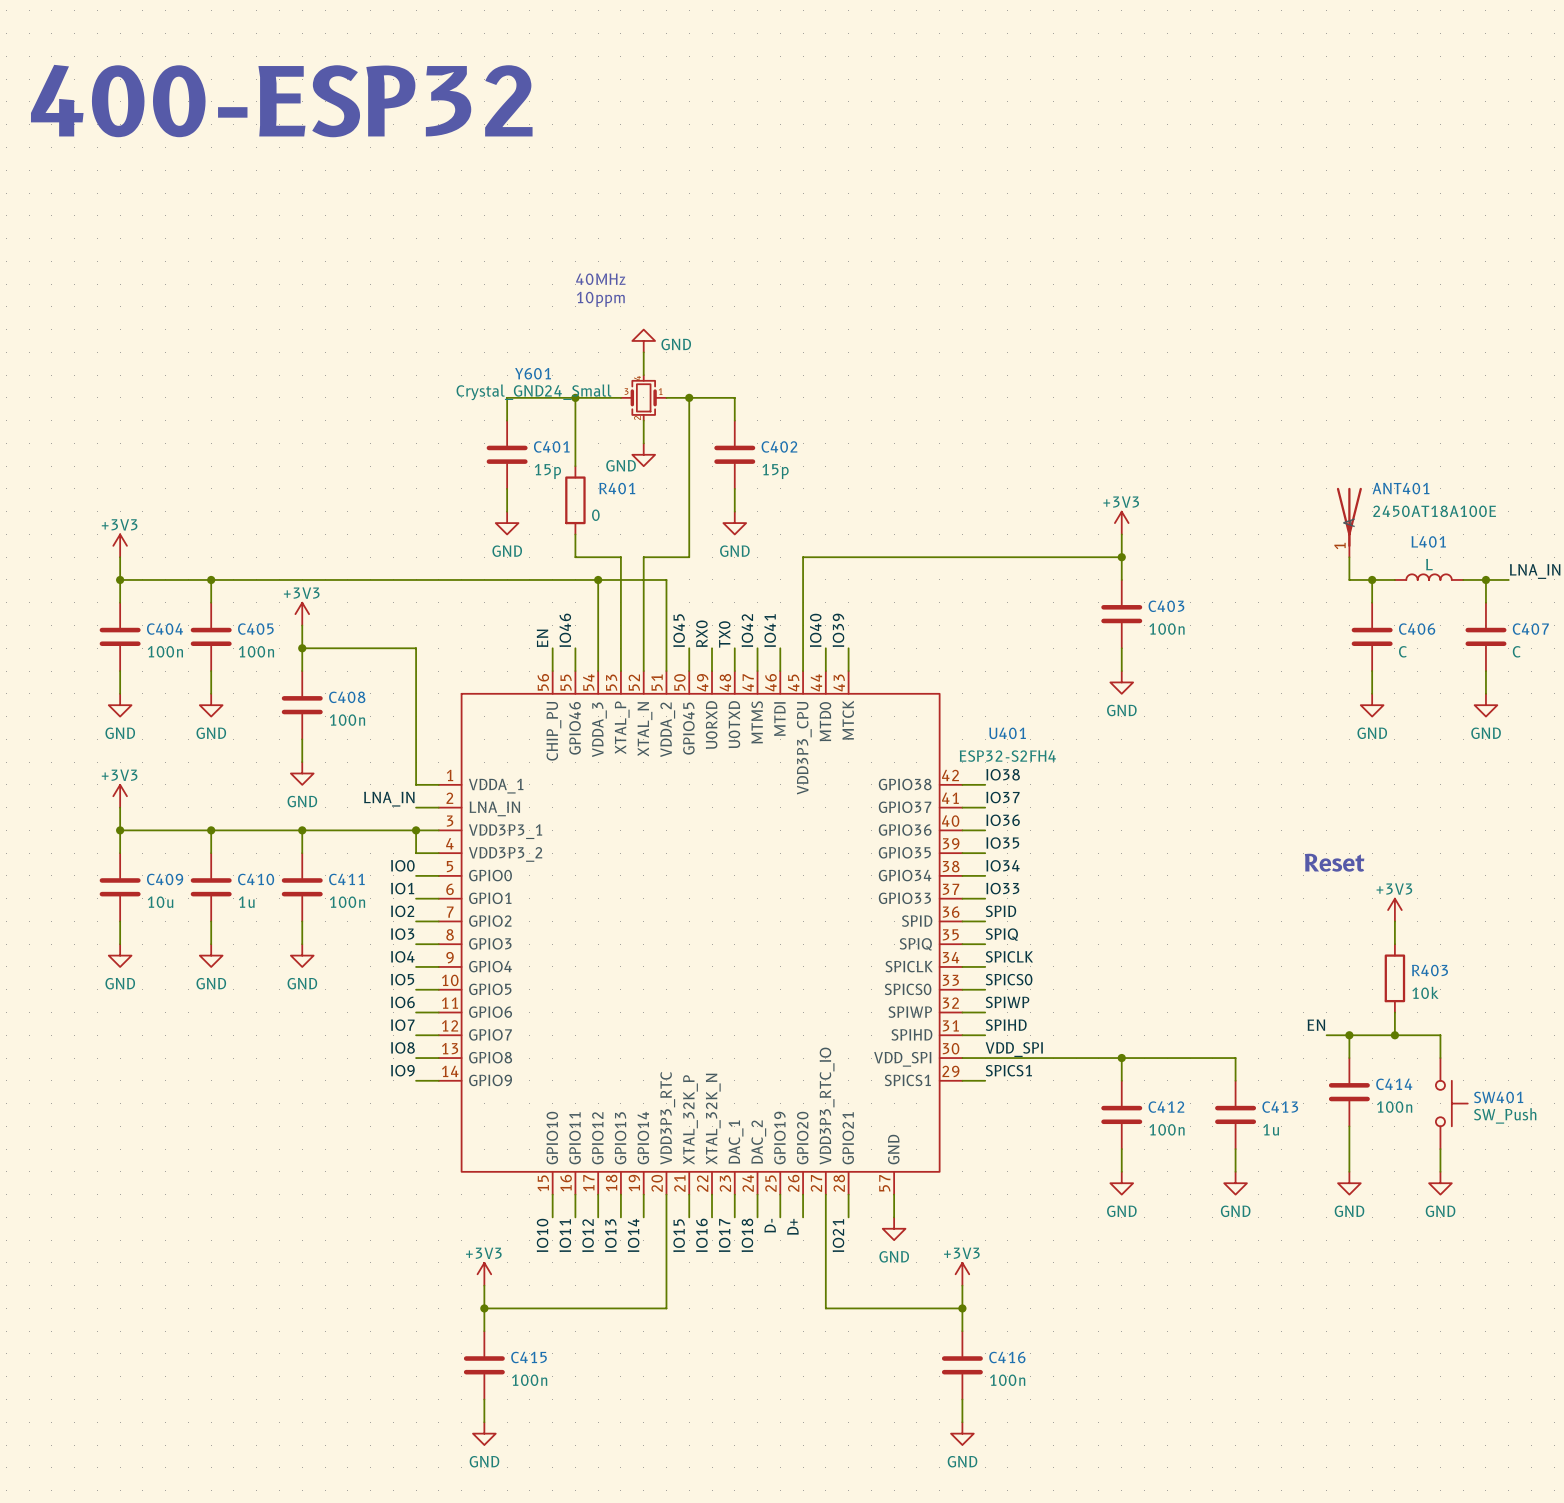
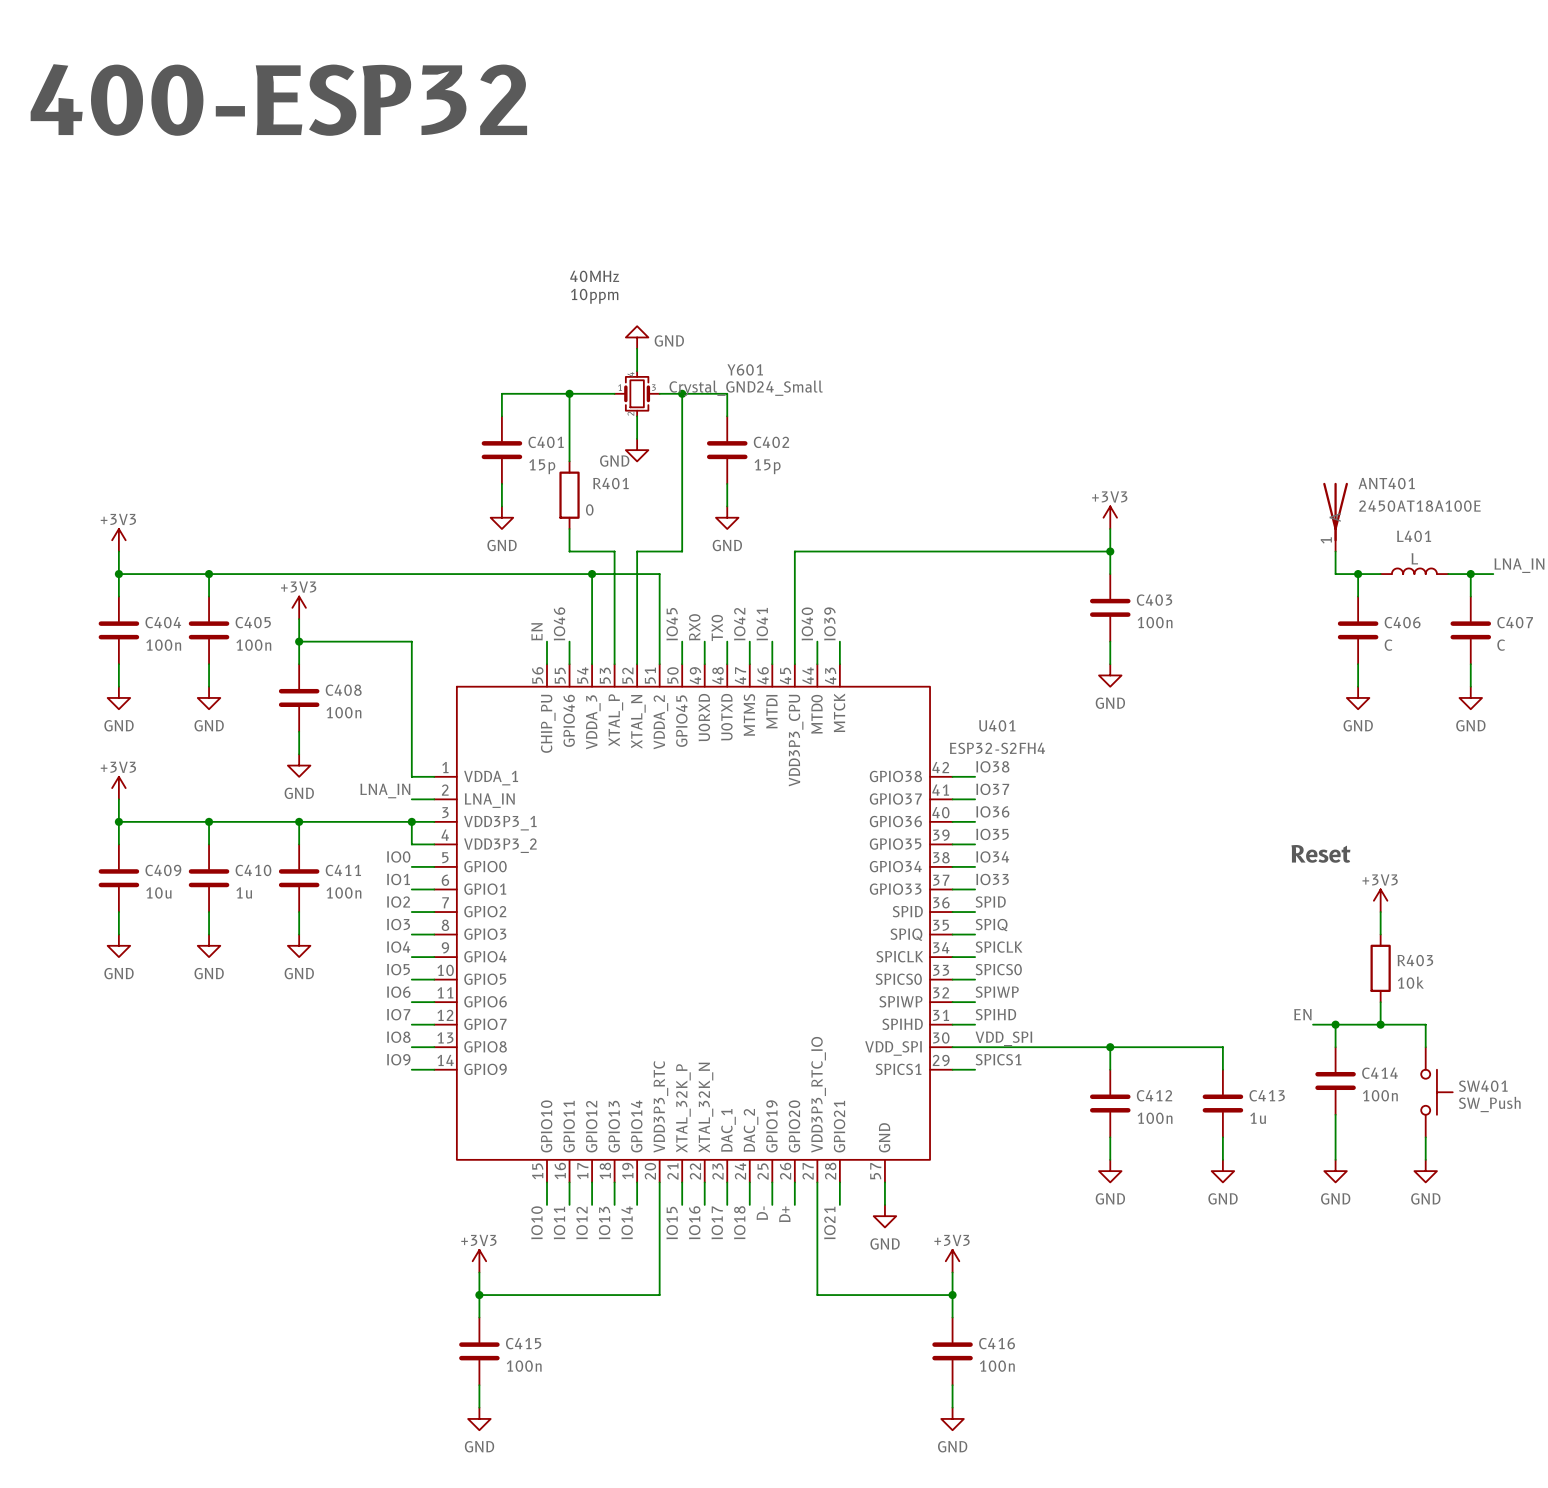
Y601 flip: as is (643, 397) -> left-right (637, 393)

